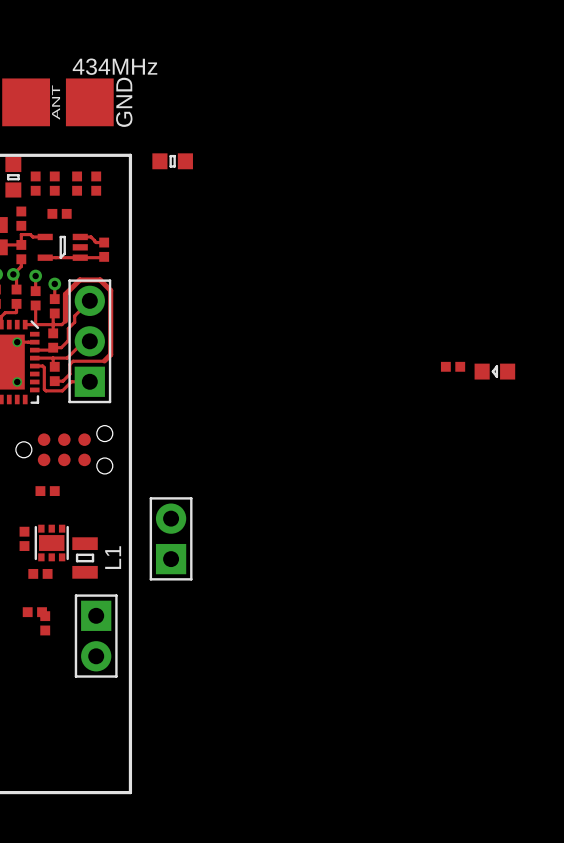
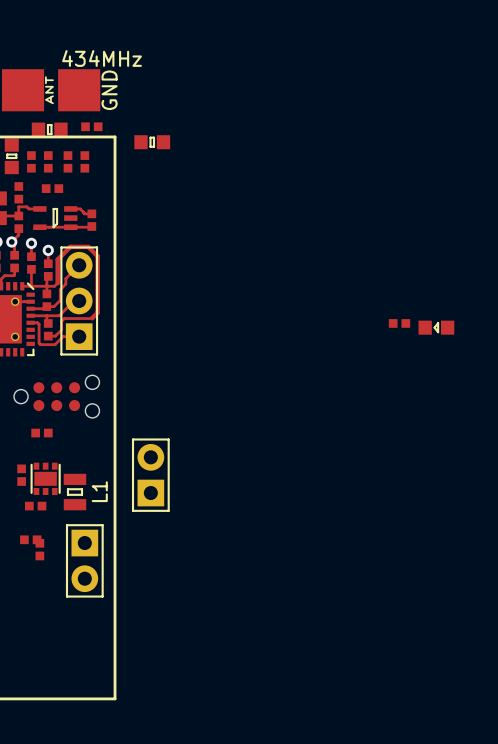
part: none -> (91, 126)
part: none -> (49, 129)

